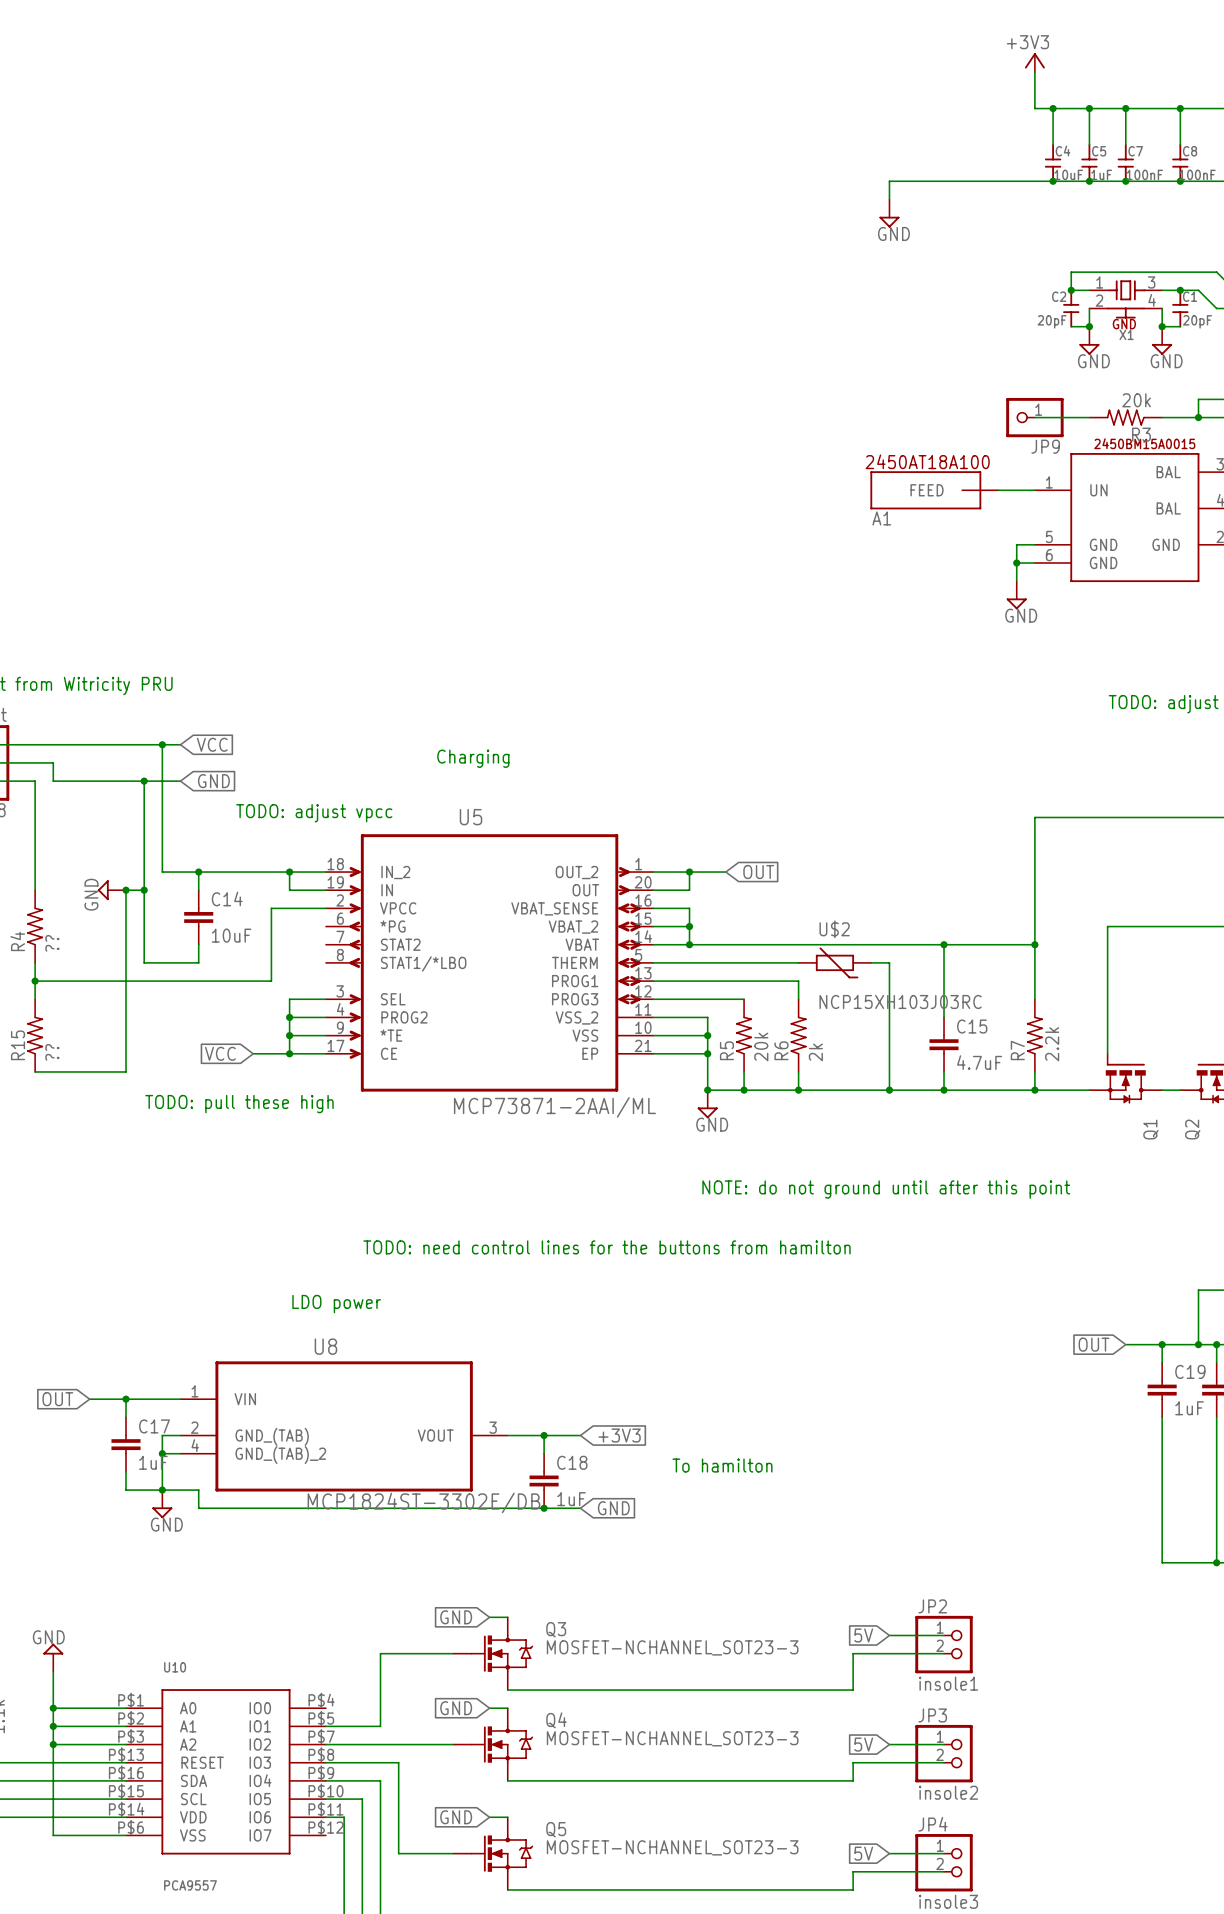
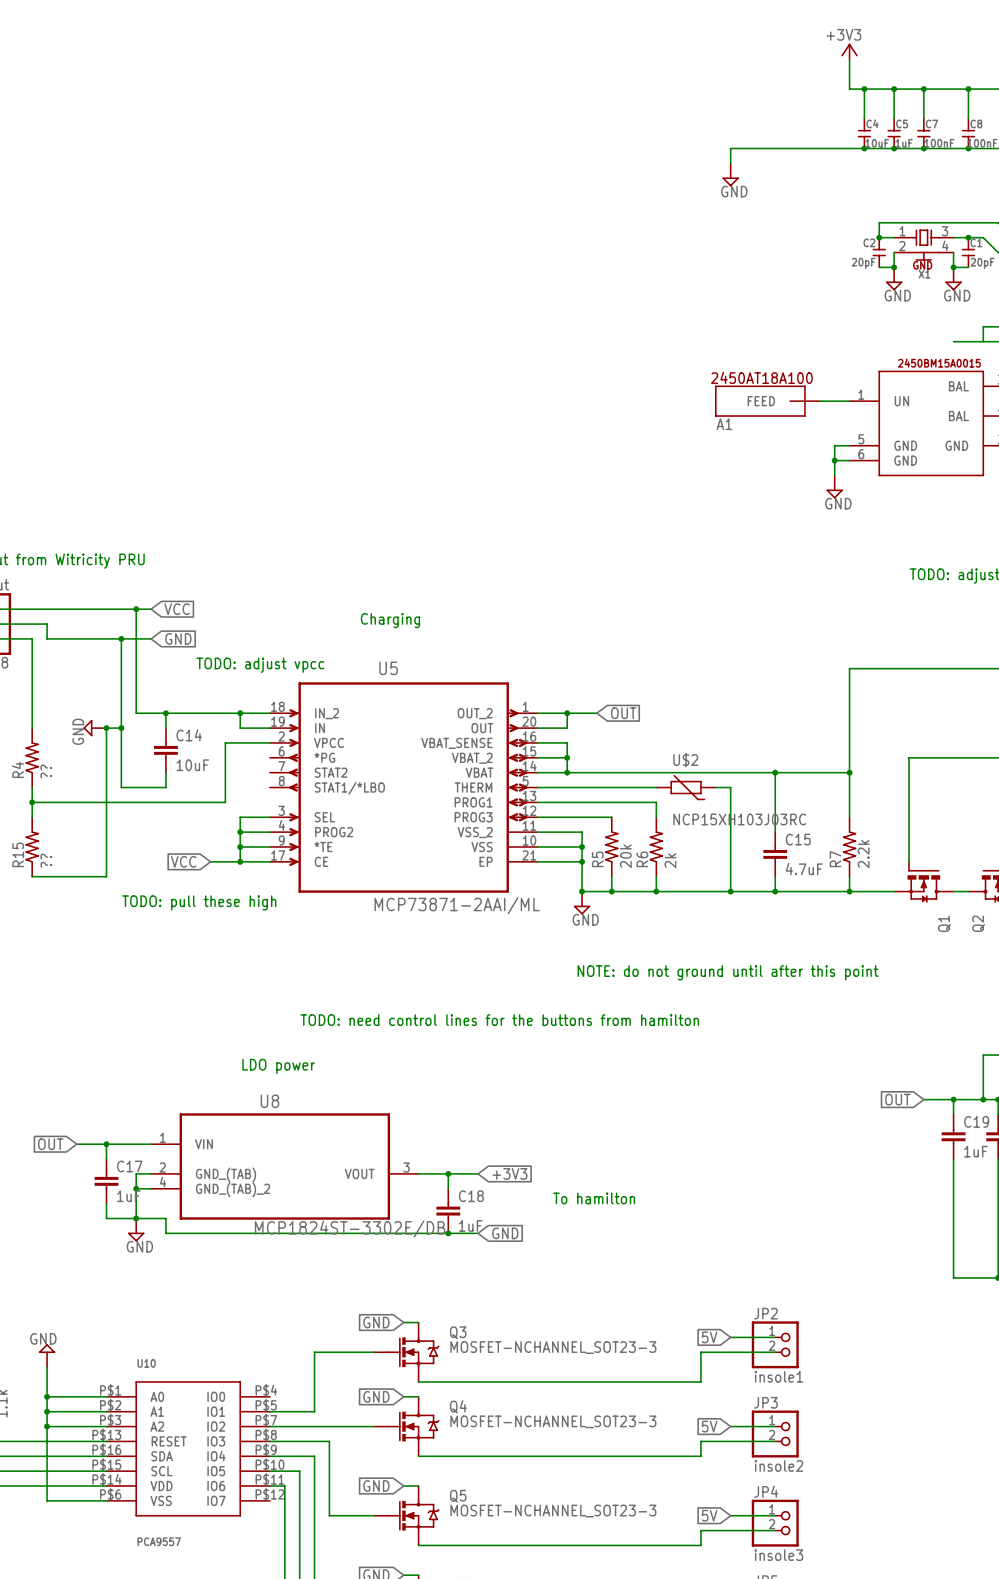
wire: (1034, 417) (1089, 417) -> none
JP9: (1034, 417) -> none
R3: 20k (1125, 417) -> none
junction: (1198, 417) -> none

